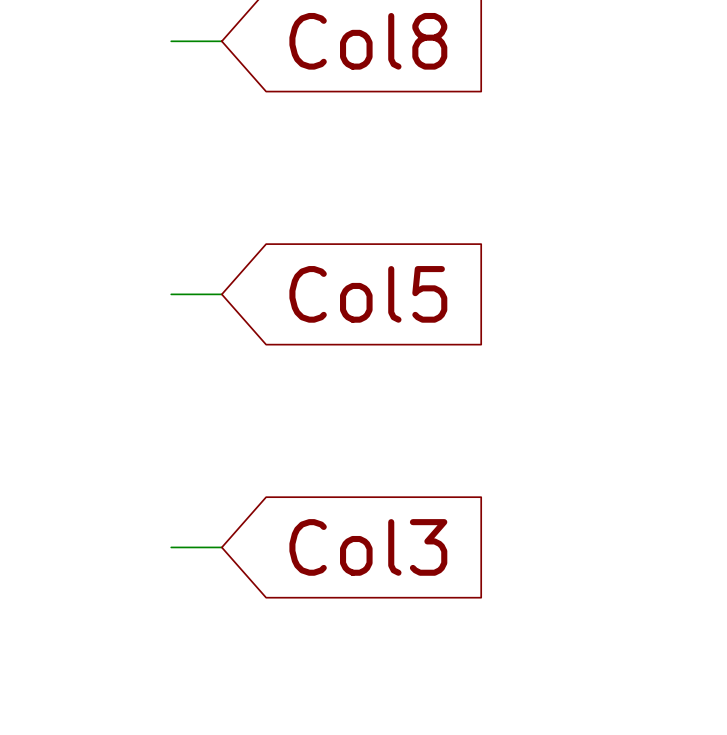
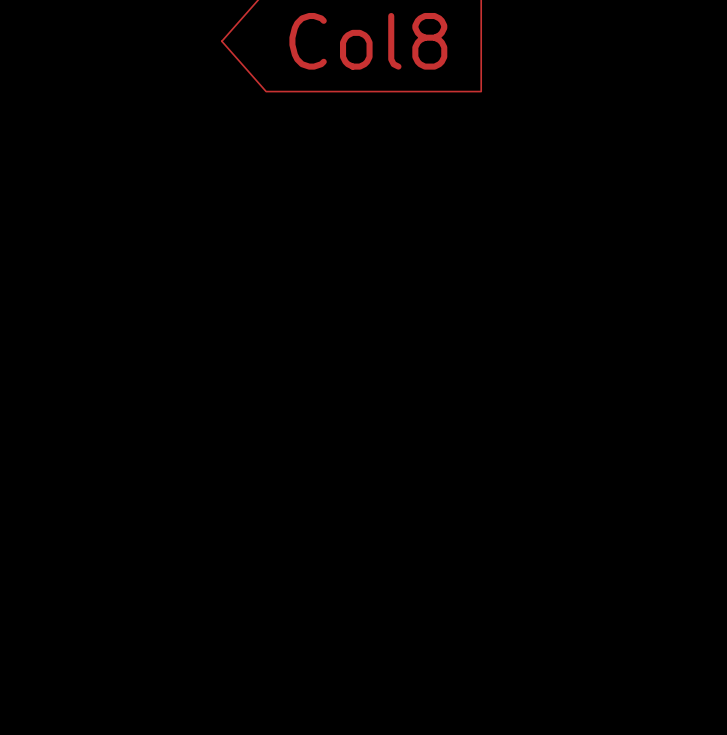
wire: (171, 41) (221, 41) -> none
wire: (171, 294) (221, 294) -> none
global label: Col5 (368, 294) -> none
wire: (171, 547) (221, 547) -> none
global label: Col3 (368, 547) -> none

